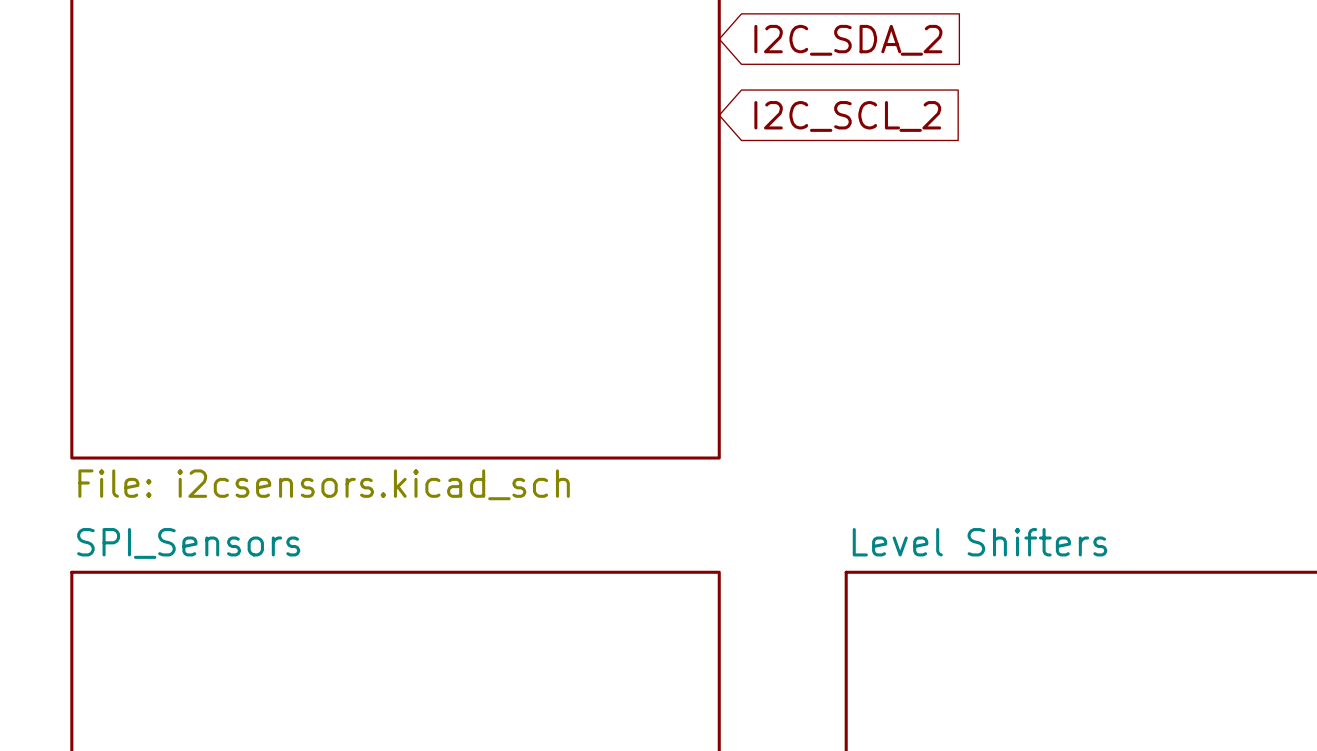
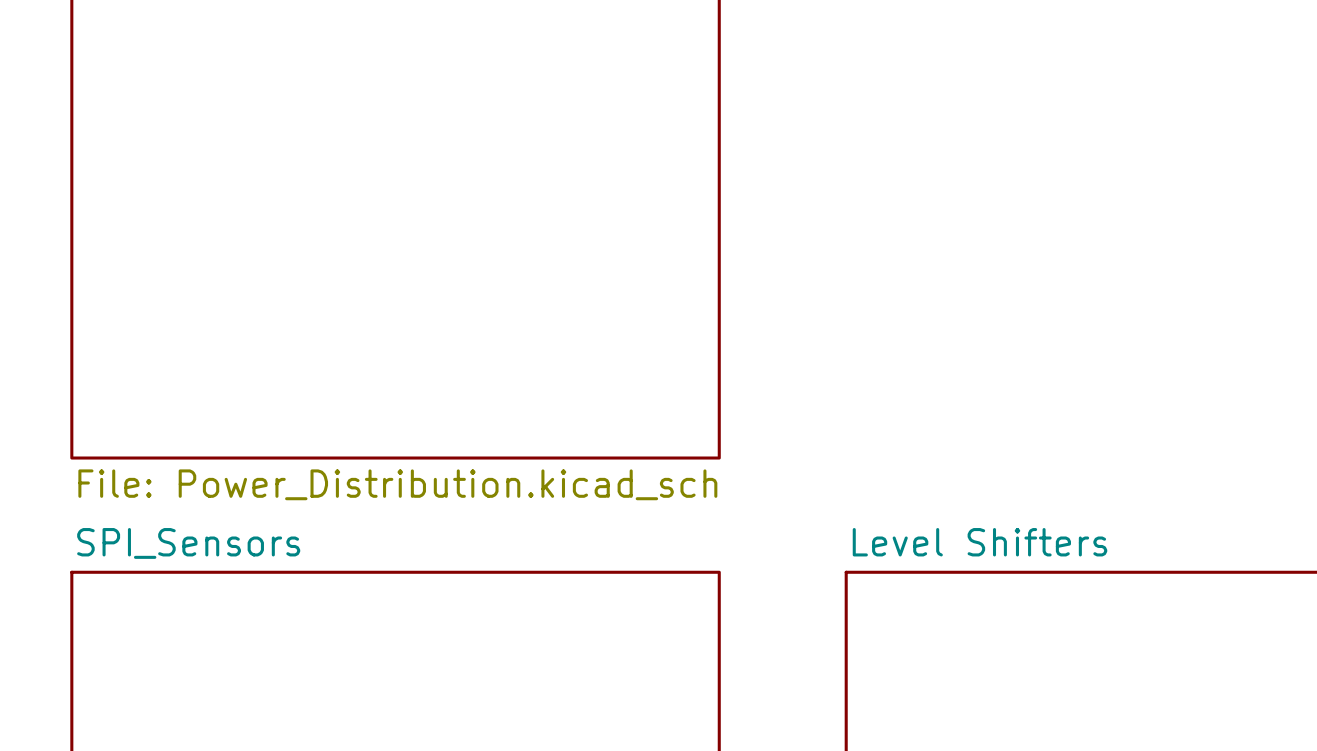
global label: I2C_SDA_2 (848, 40) -> none
global label: I2C_SCL_2 (847, 116) -> none
sheet value: File: i2csensors.kicad_sch (324, 484) -> File: Power_Distribution.kicad_sch (397, 484)

